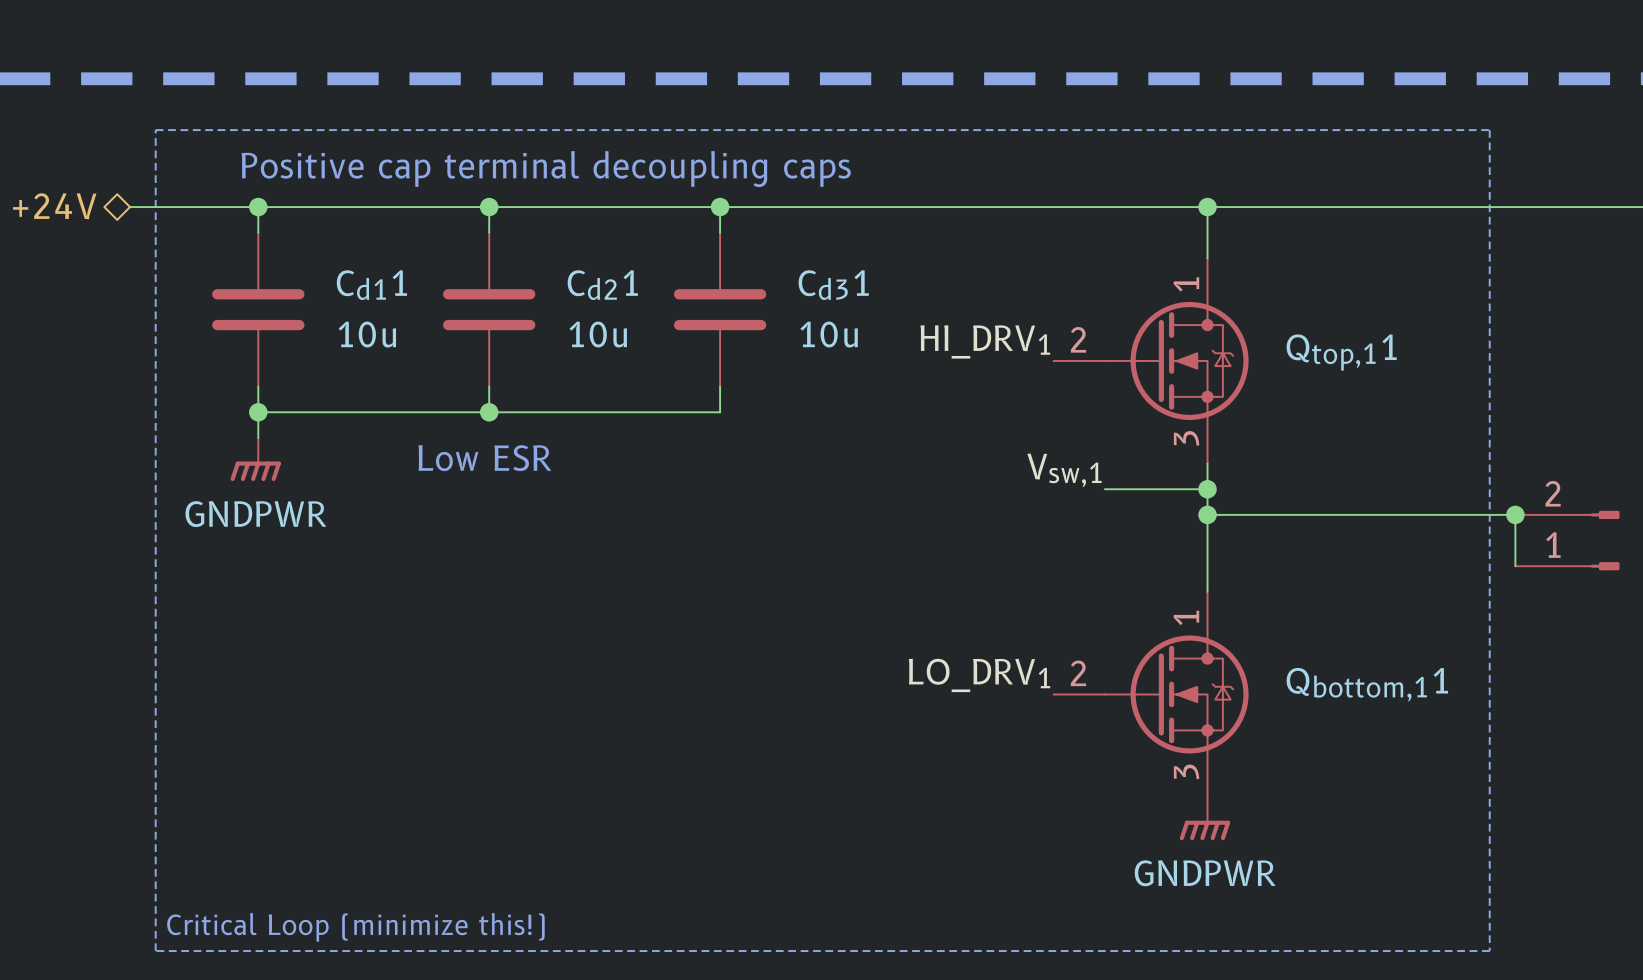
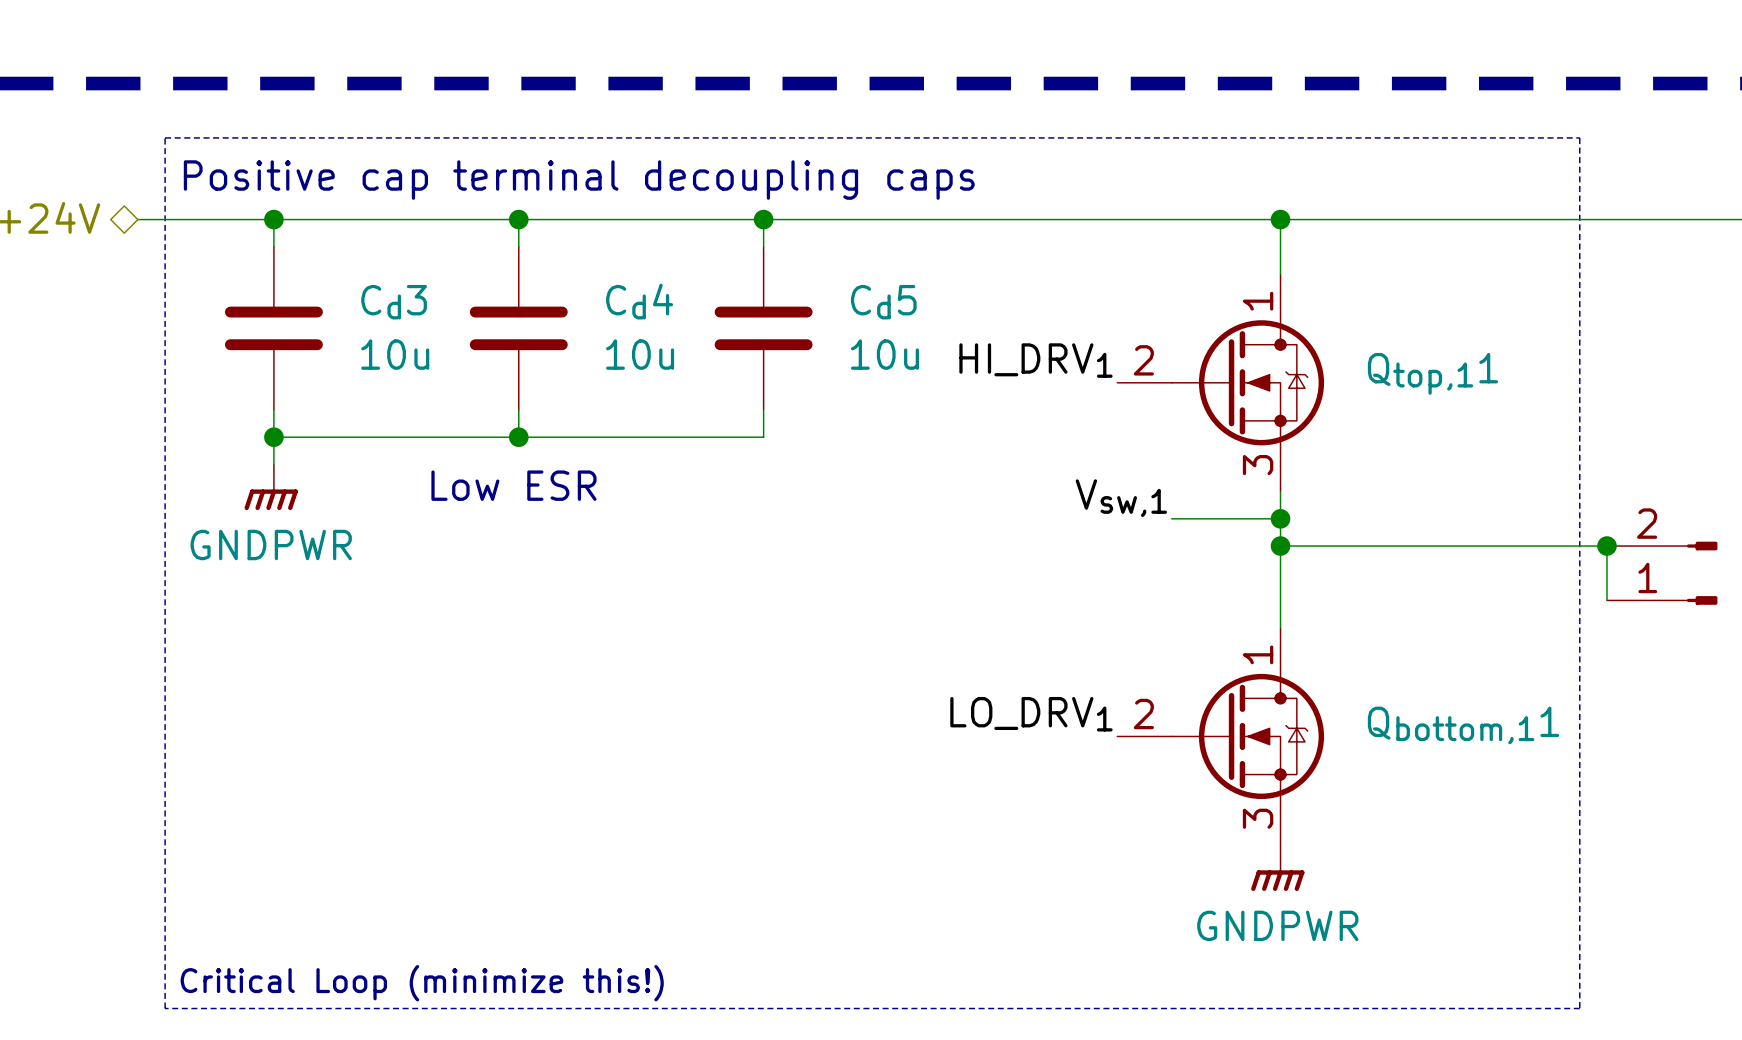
Cd11 name: Cd11 (371, 285) -> Cd3 (394, 302)
Cd21 name: Cd21 (602, 285) -> Cd4 (639, 301)
Cd31 name: Cd31 (833, 285) -> Cd5 (883, 302)

